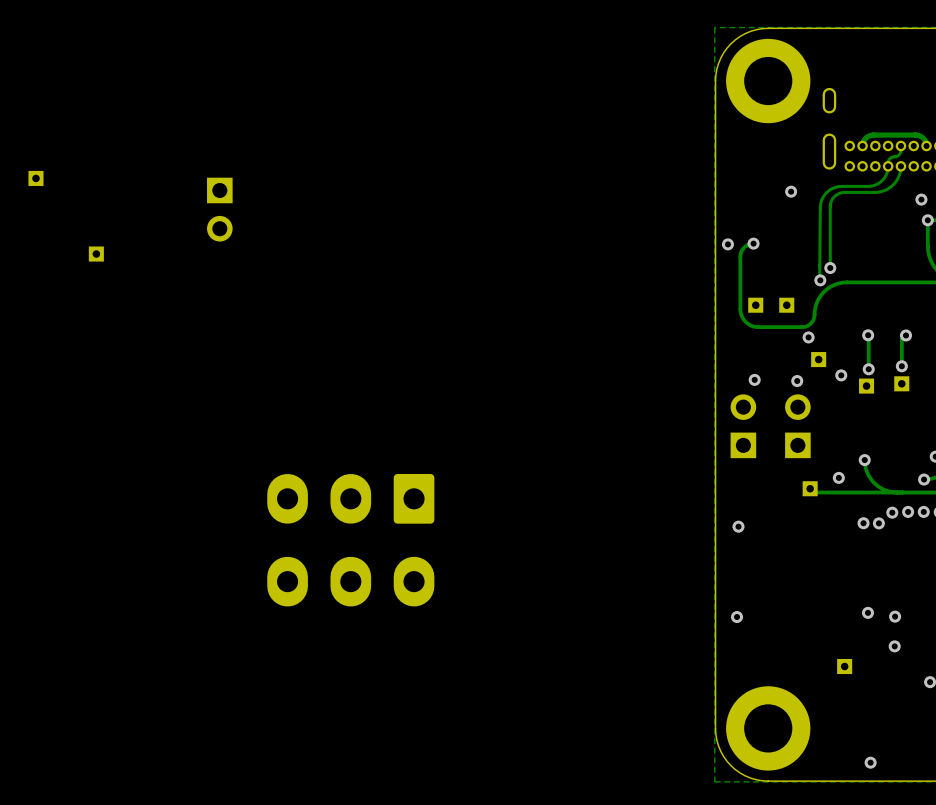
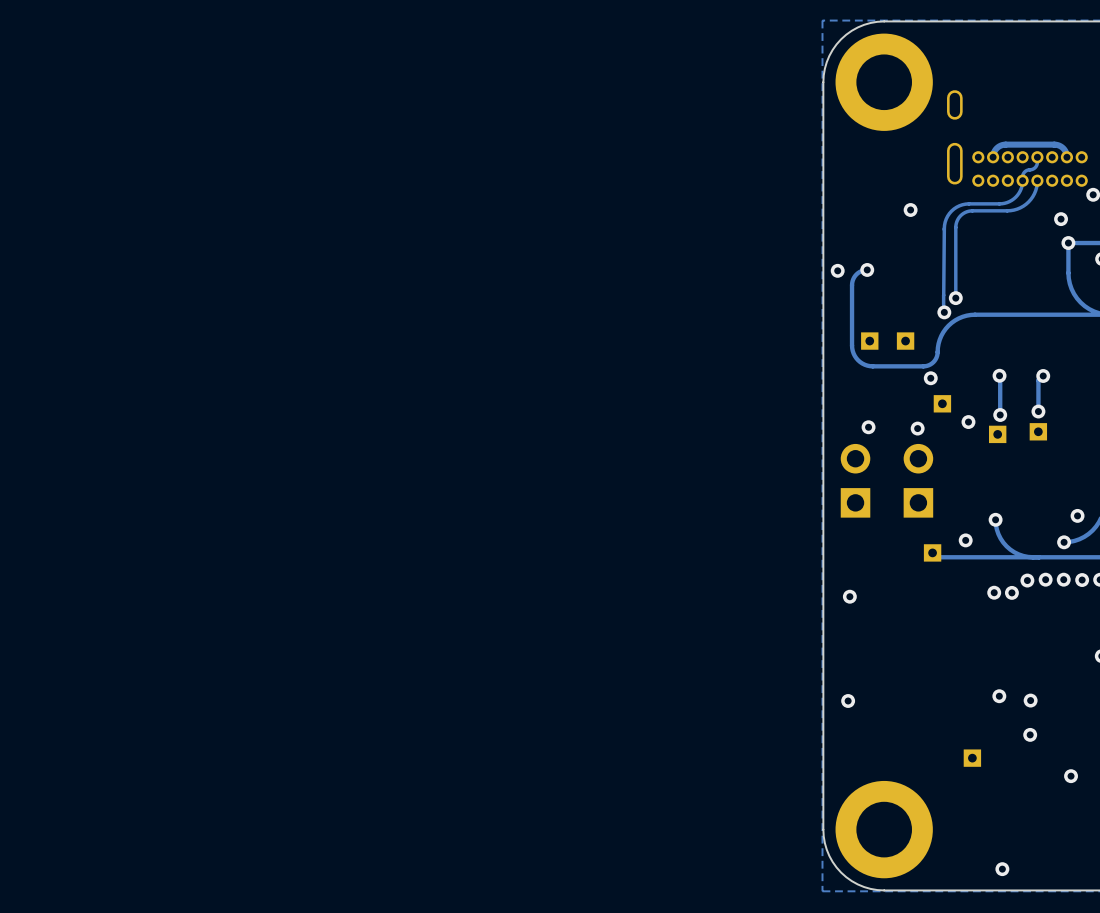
part: (35, 178) -> none
part: (219, 209) -> none
part: (96, 254) -> none
part: (350, 540) -> none

